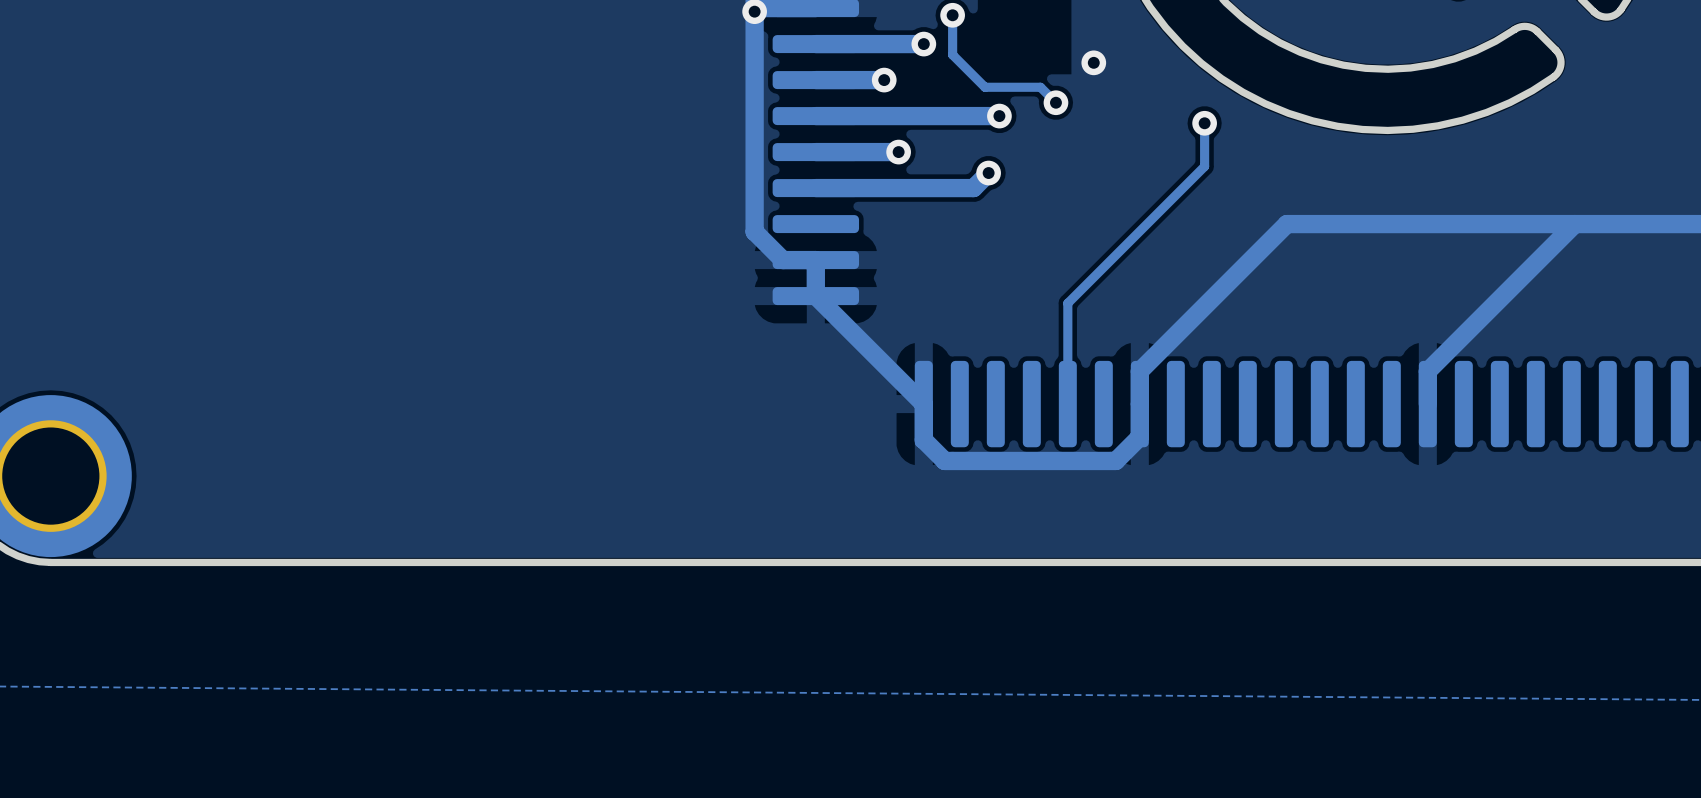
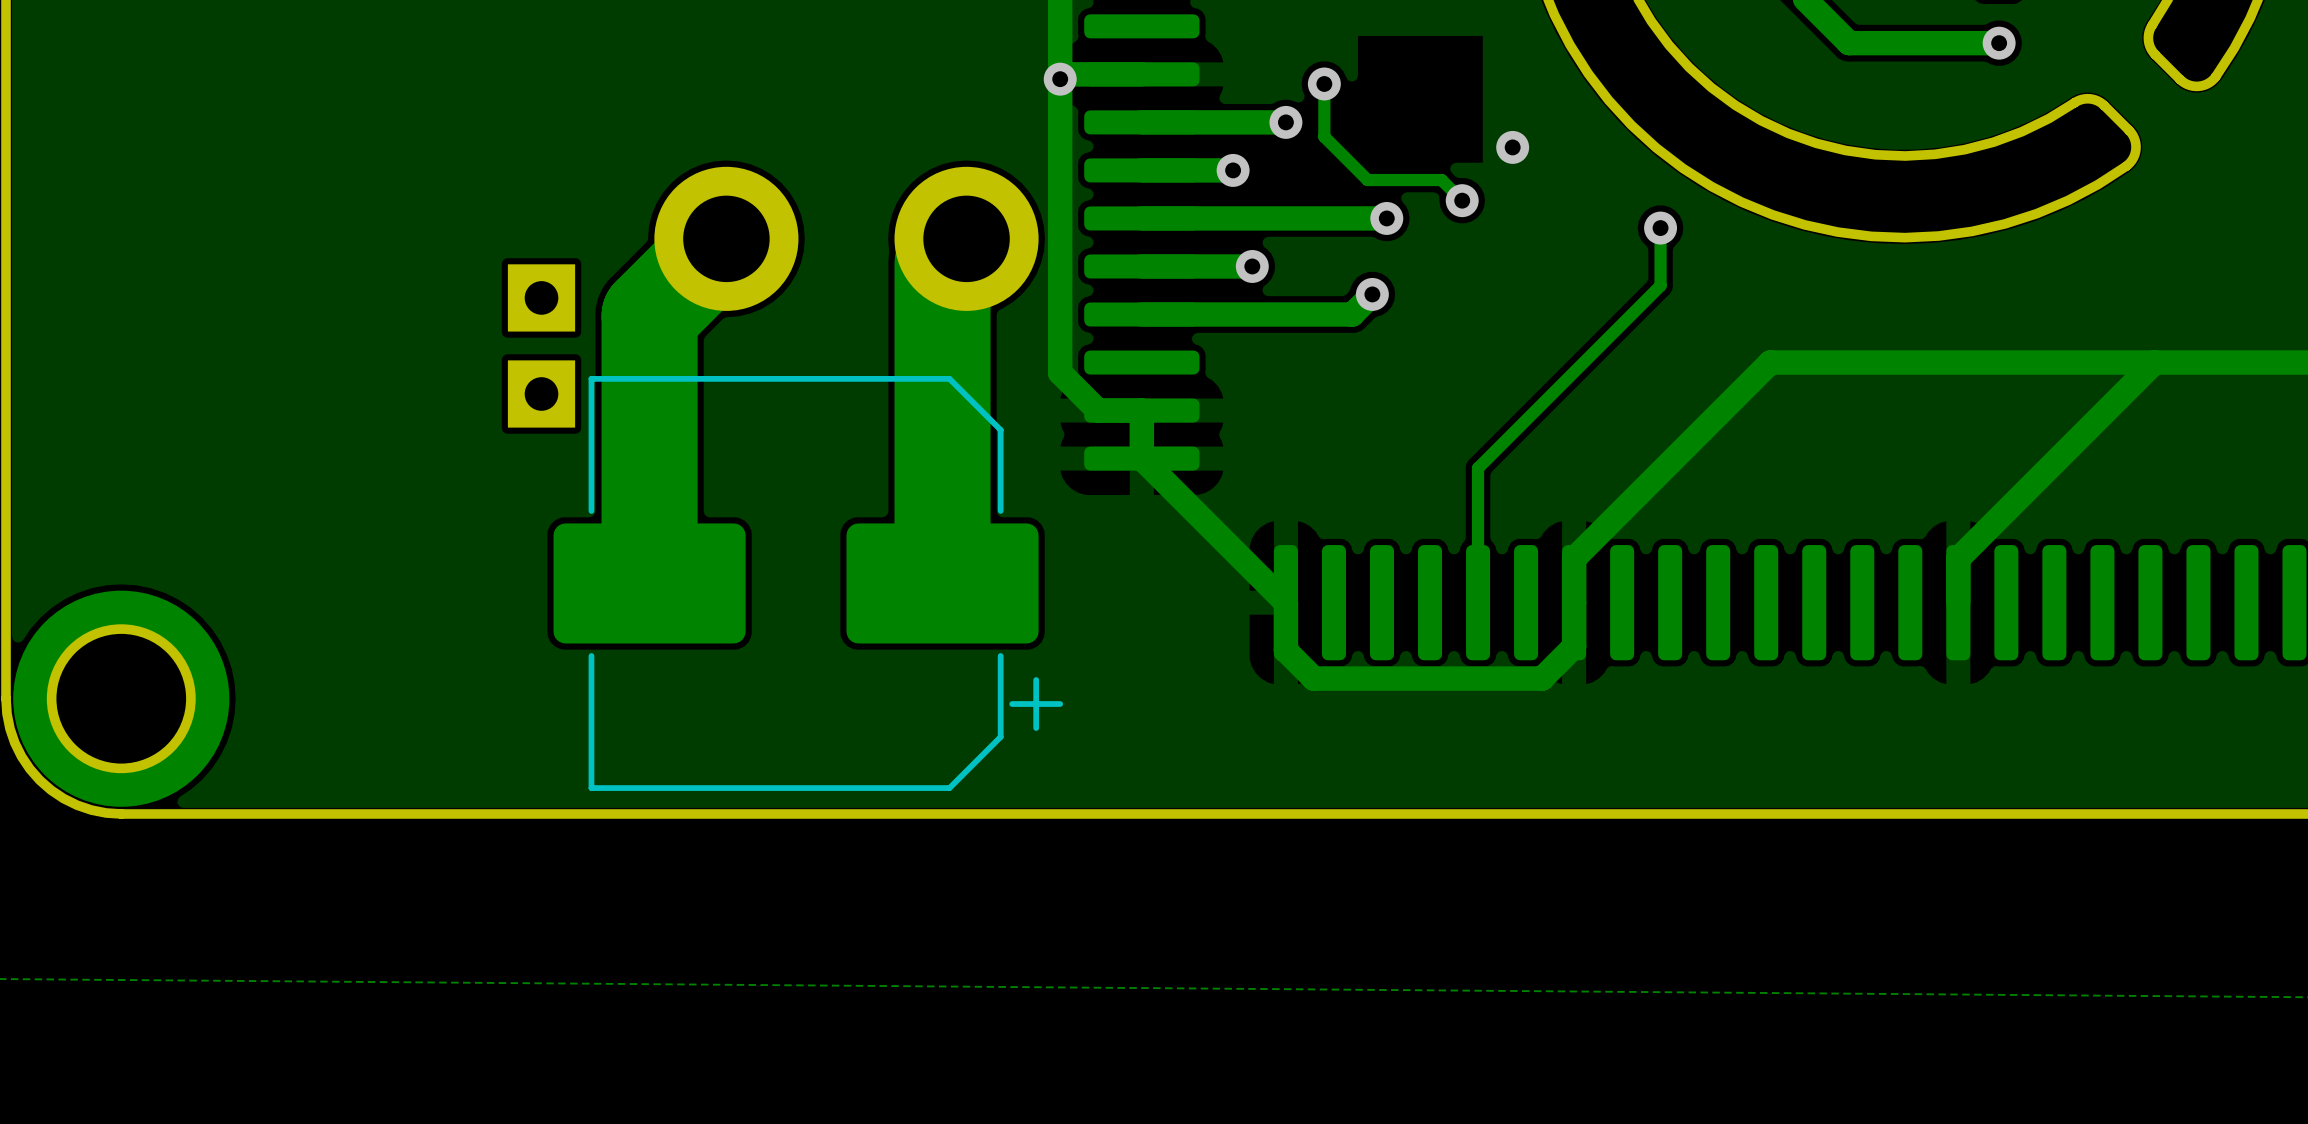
track: none -> (726, 238) (649, 315) (649, 583)
track: none -> (942, 262) (942, 583)
part: none -> (773, 297)
part: none -> (808, 583)

